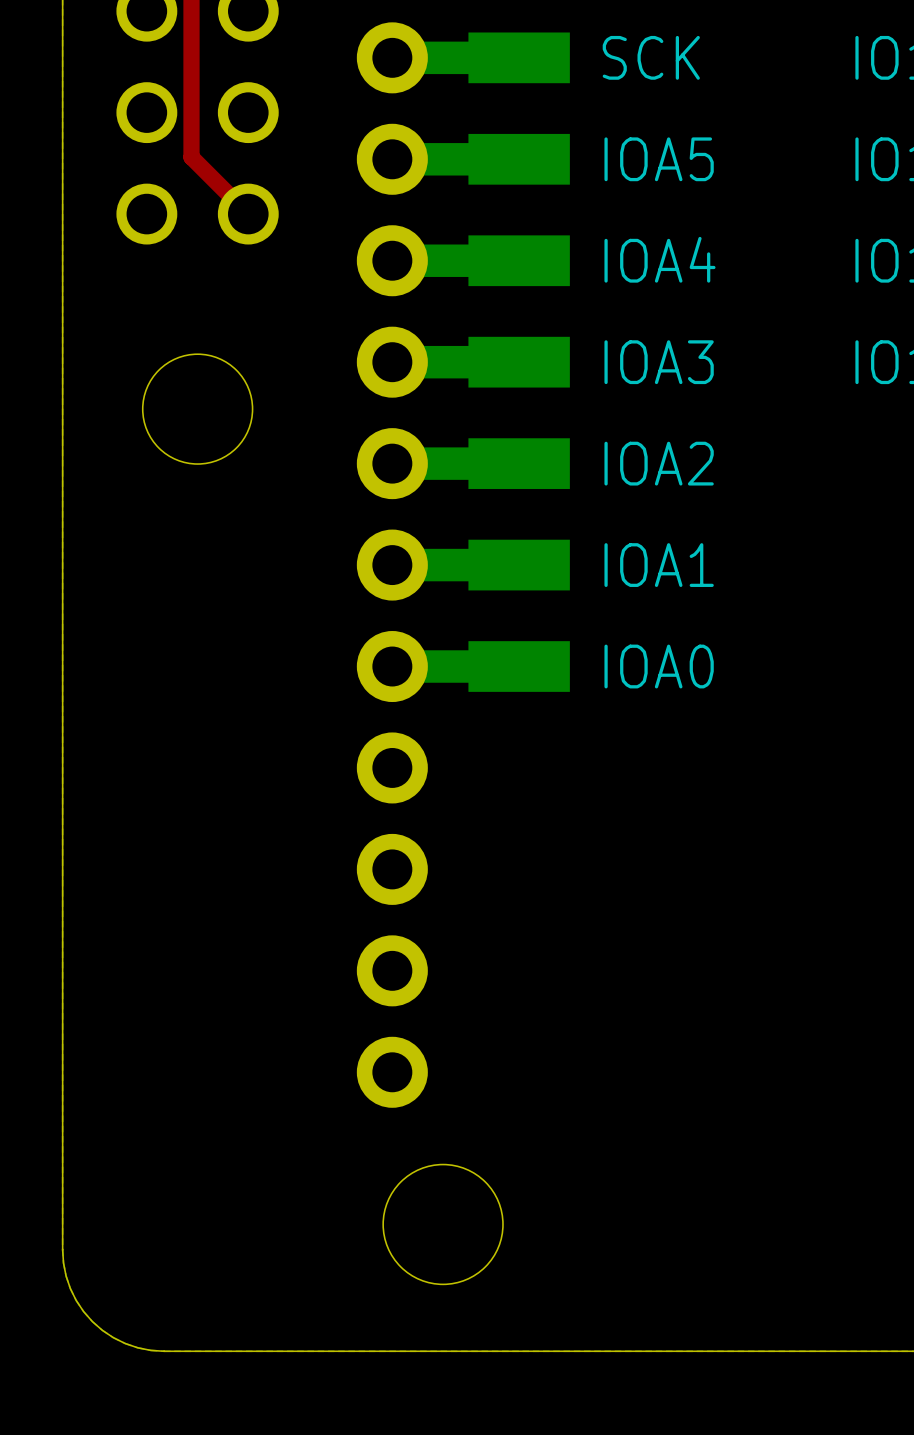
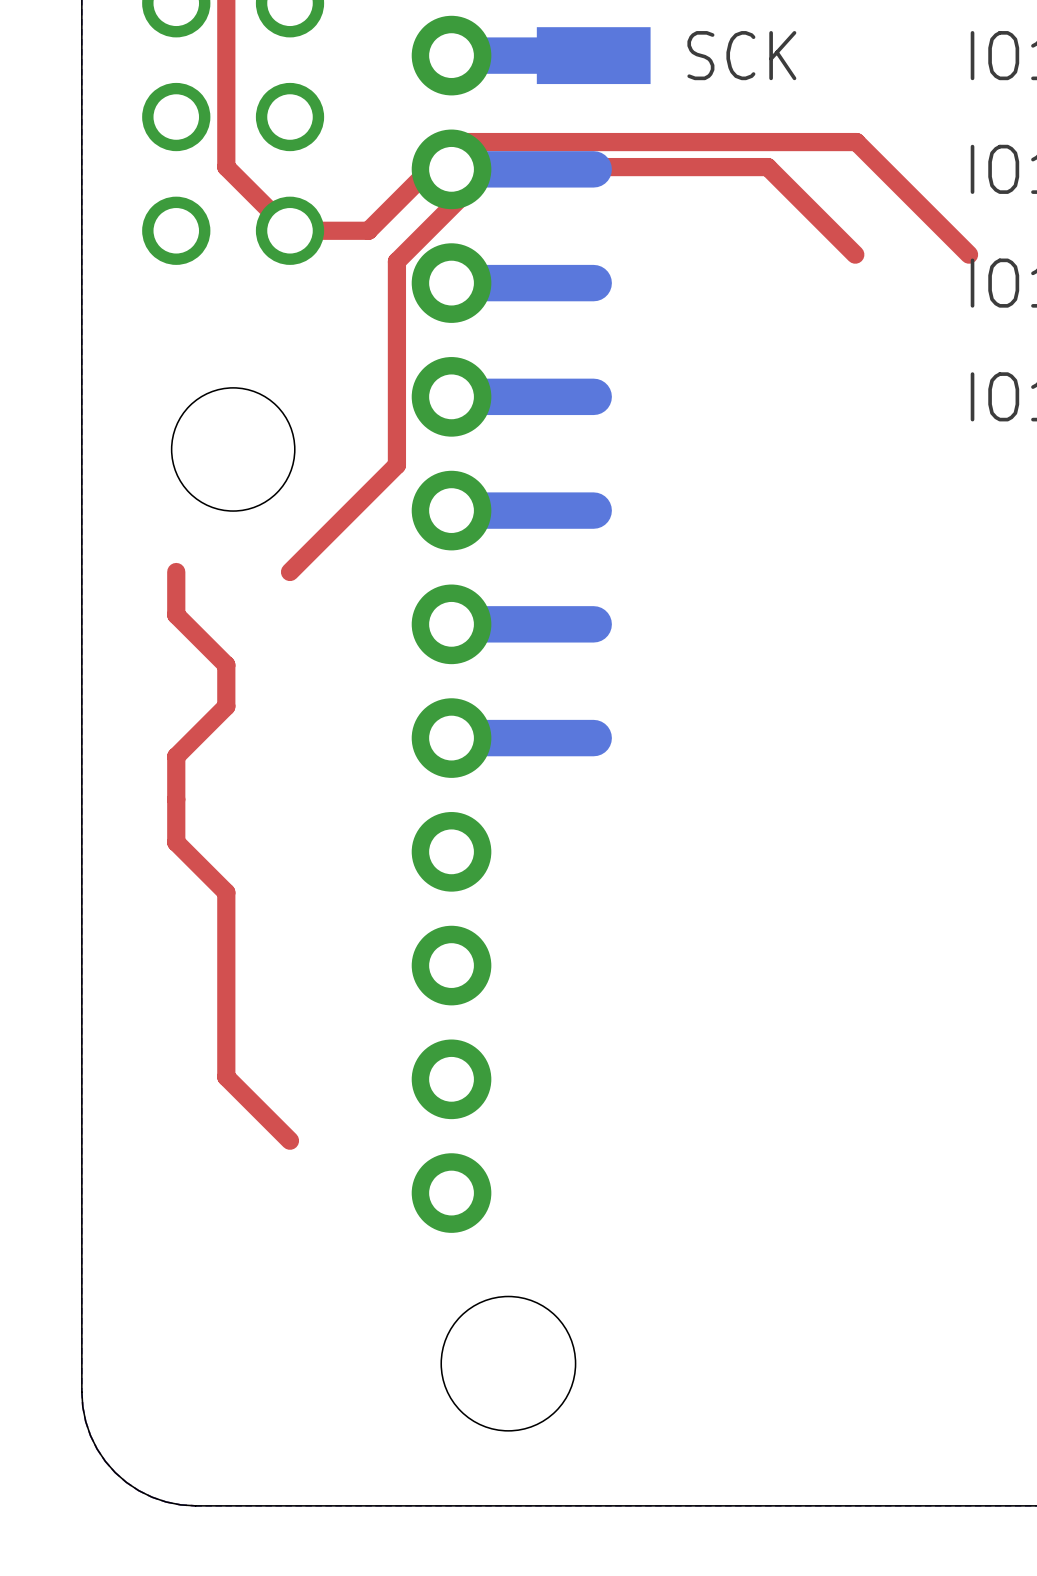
IOA5: (519, 159) -> none
top track: none -> (290, 230) (368, 230) (457, 142) (856, 142) (969, 254)
top track: none -> (855, 254) (767, 167) (491, 167) (396, 261) (396, 465) (290, 572)
IOA4: (519, 260) -> none
IOA3: (519, 362) -> none
IOA2: (519, 463) -> none
top track: none -> (176, 572) (176, 614) (226, 665) (226, 706) (176, 756) (176, 842) (226, 892) (226, 1077) (290, 1140)
IOA1: (519, 565) -> none
IOA0: (519, 666) -> none

